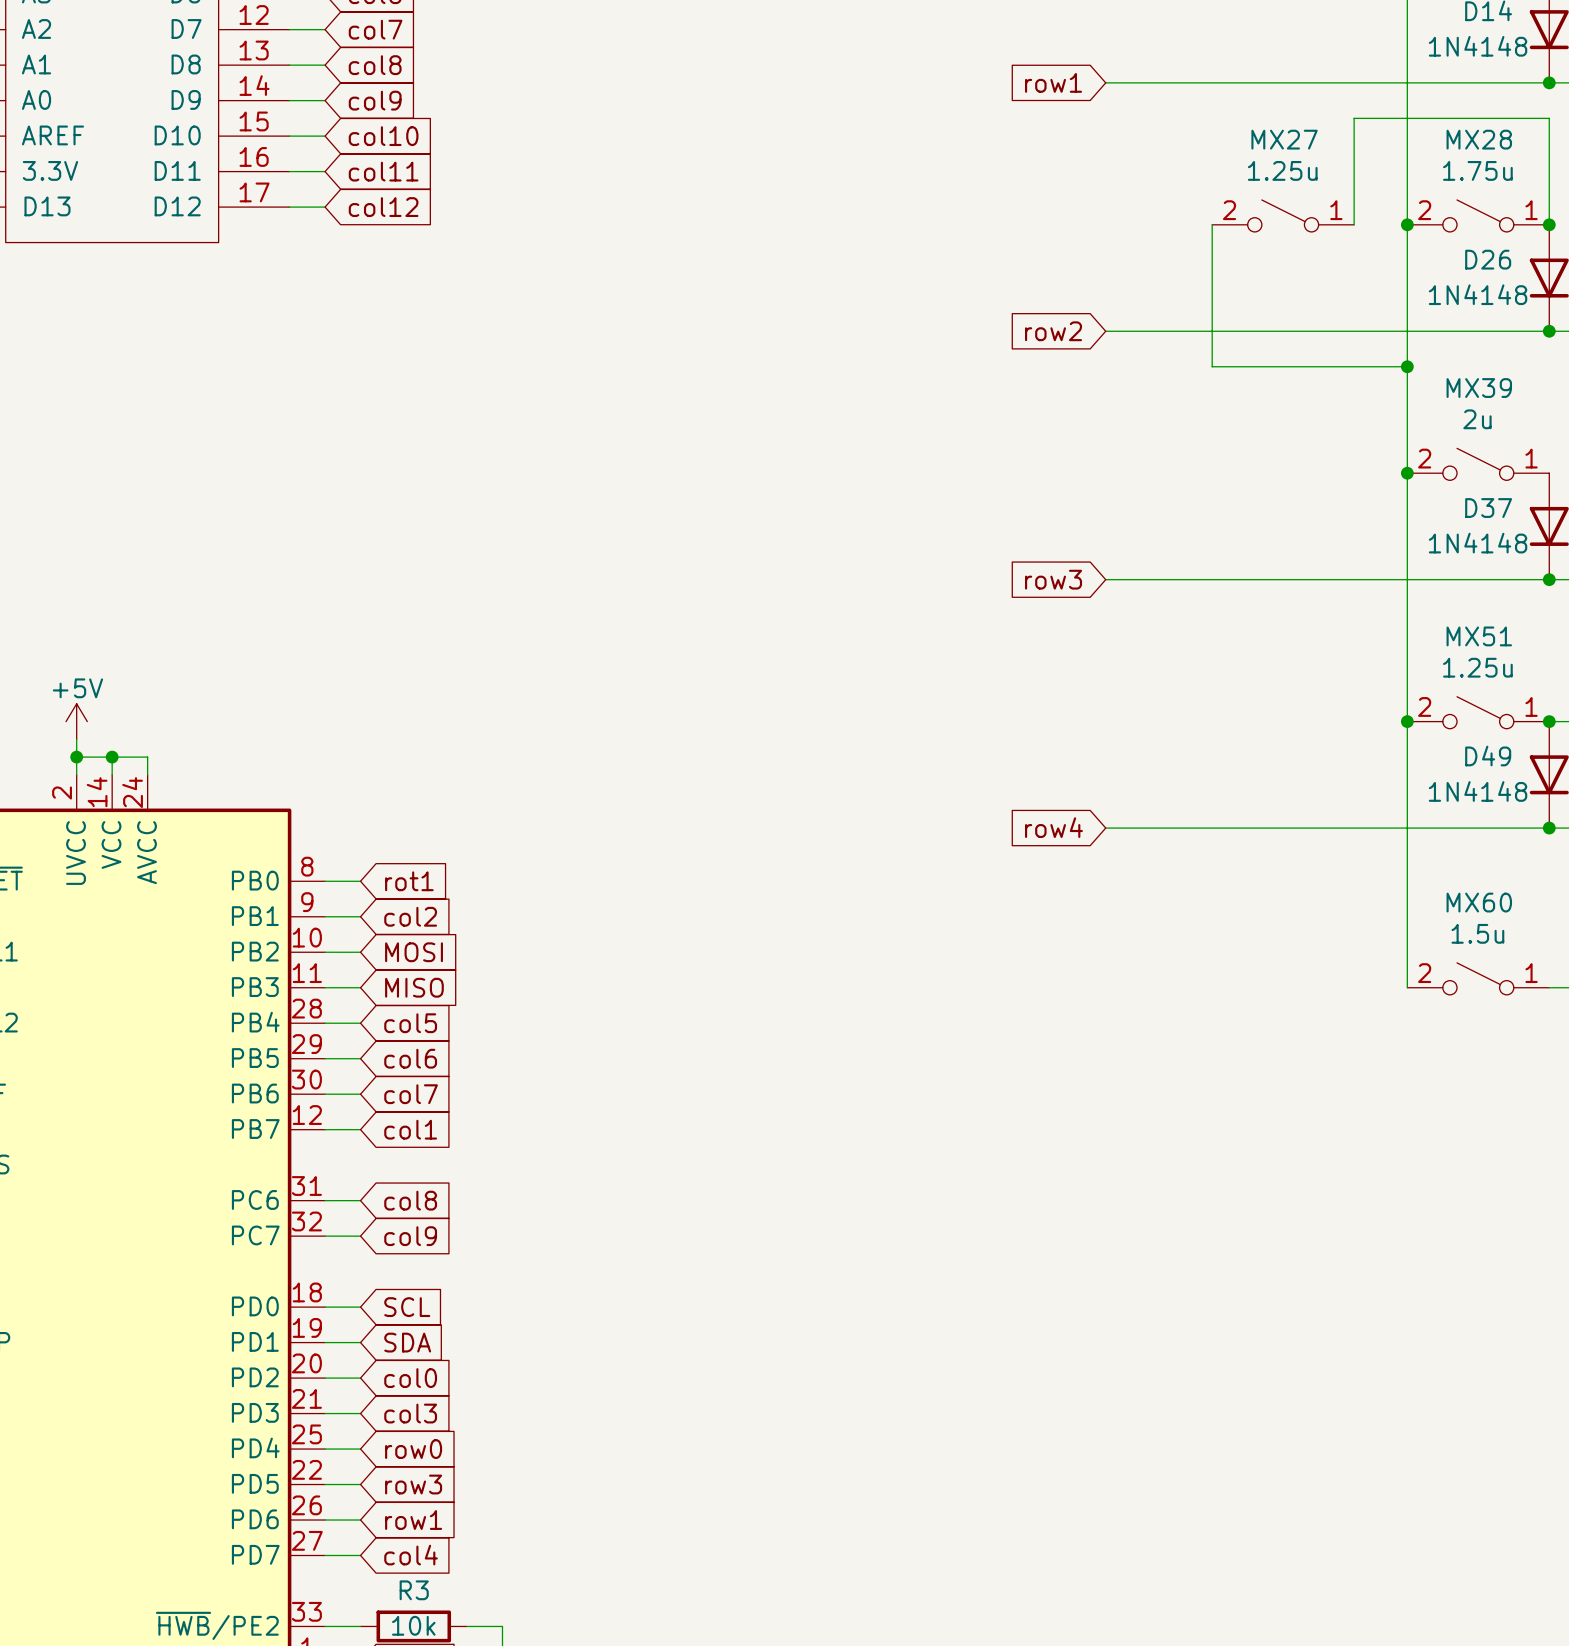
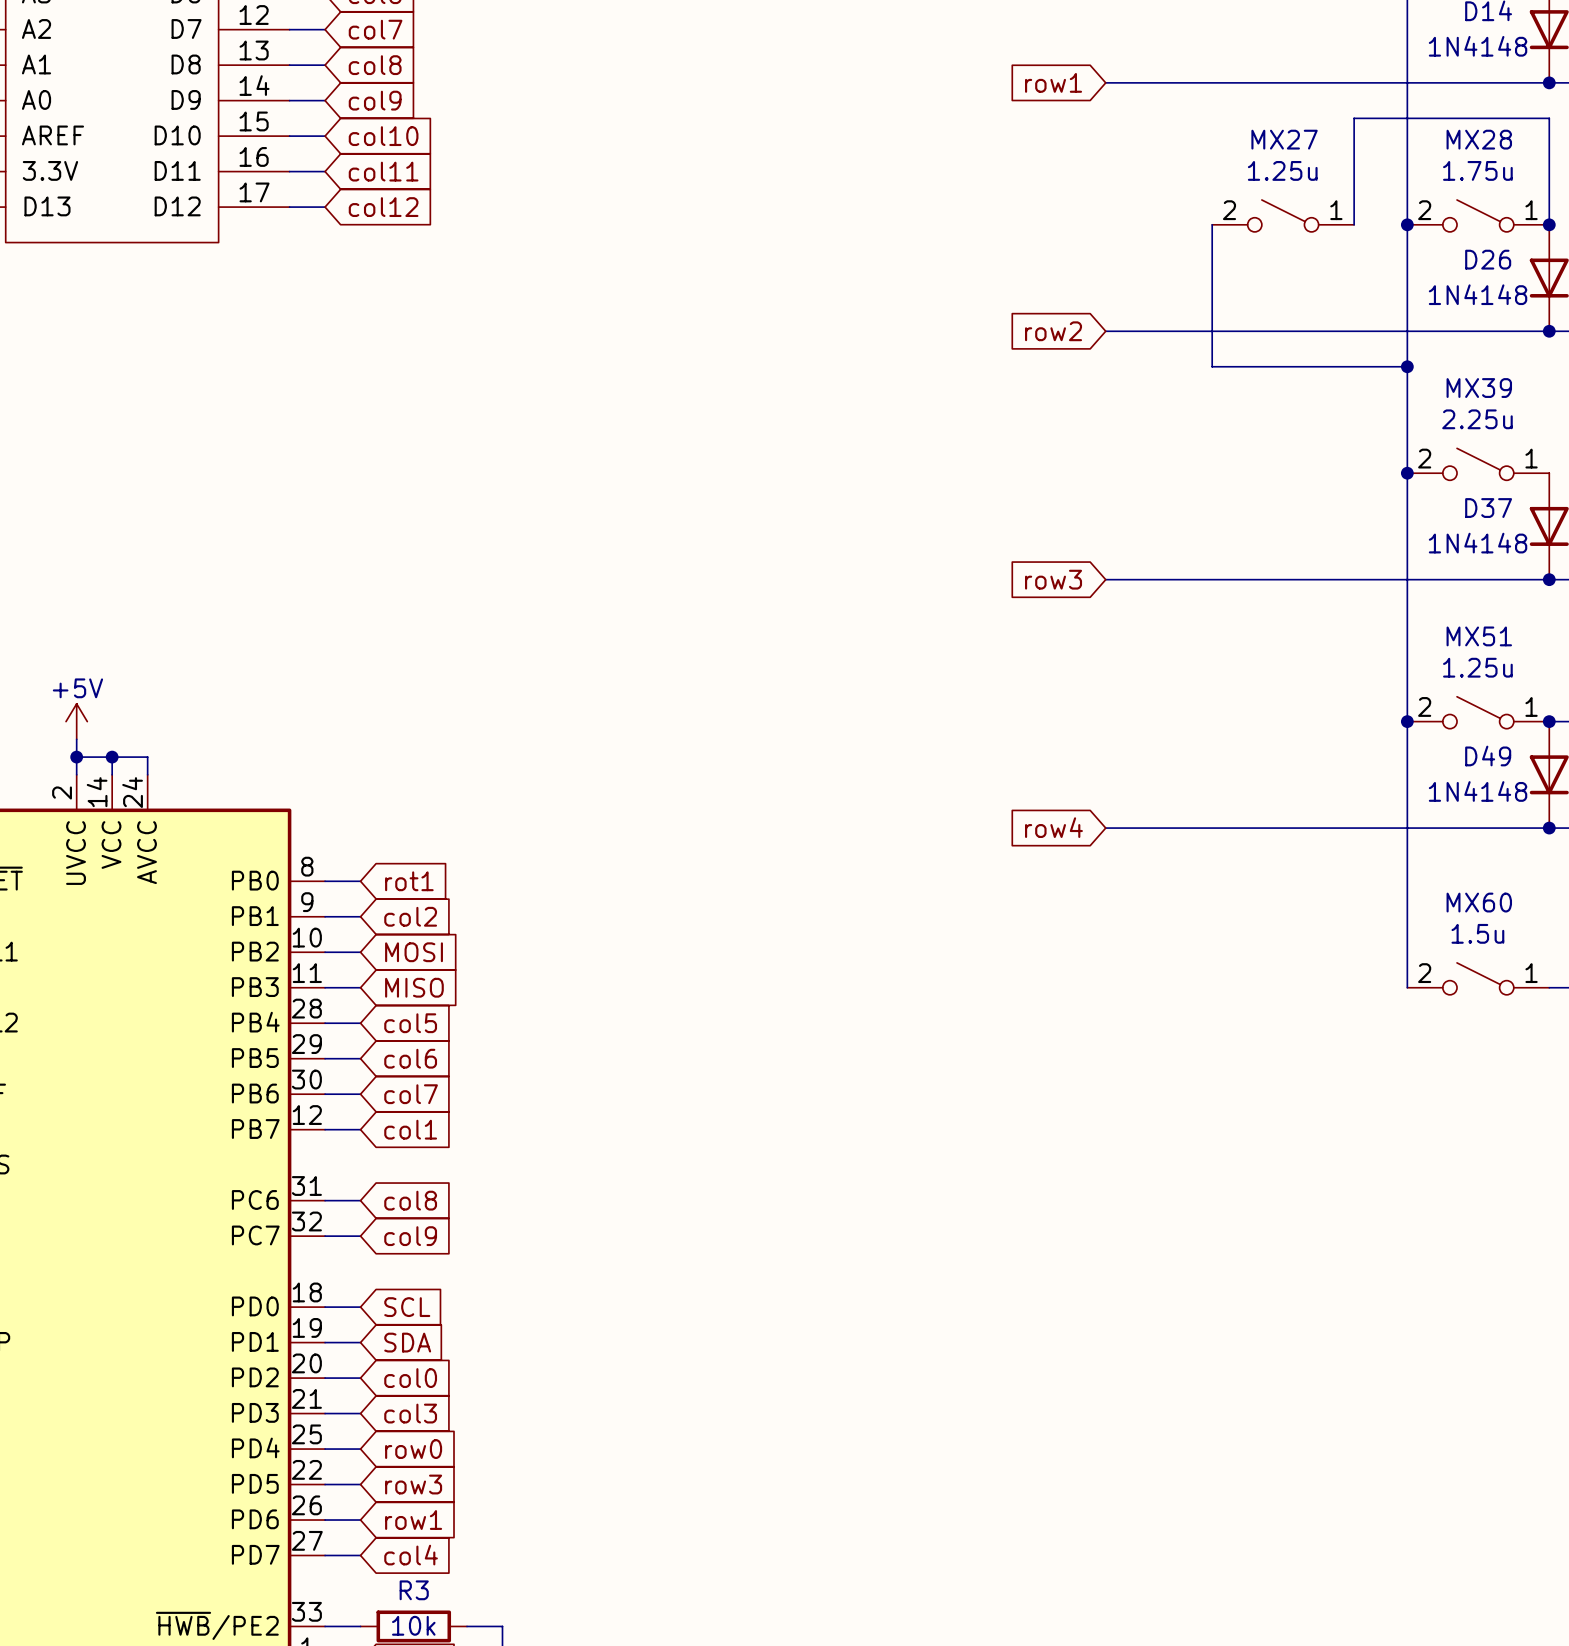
MX39 value: 2u (1477, 419) -> 2.25u (1477, 419)

